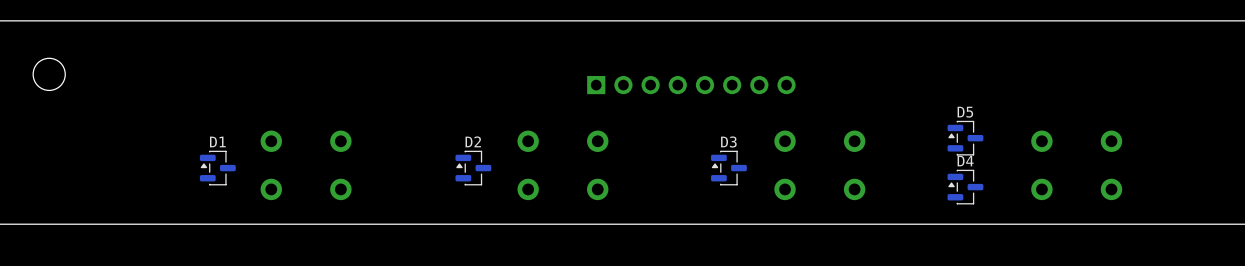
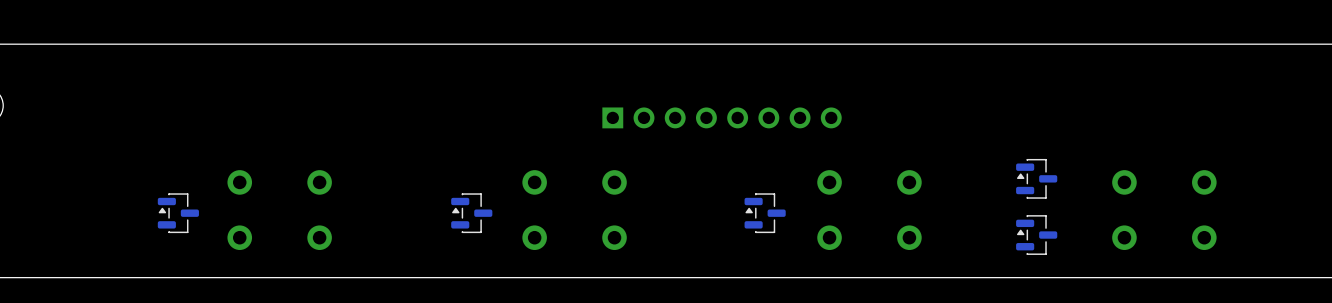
D5 name: D5 (965, 112) -> none
D1 name: D1 (217, 141) -> none
D2 name: D2 (473, 141) -> none
D3 name: D3 (728, 141) -> none
D4 name: D4 (965, 161) -> none

